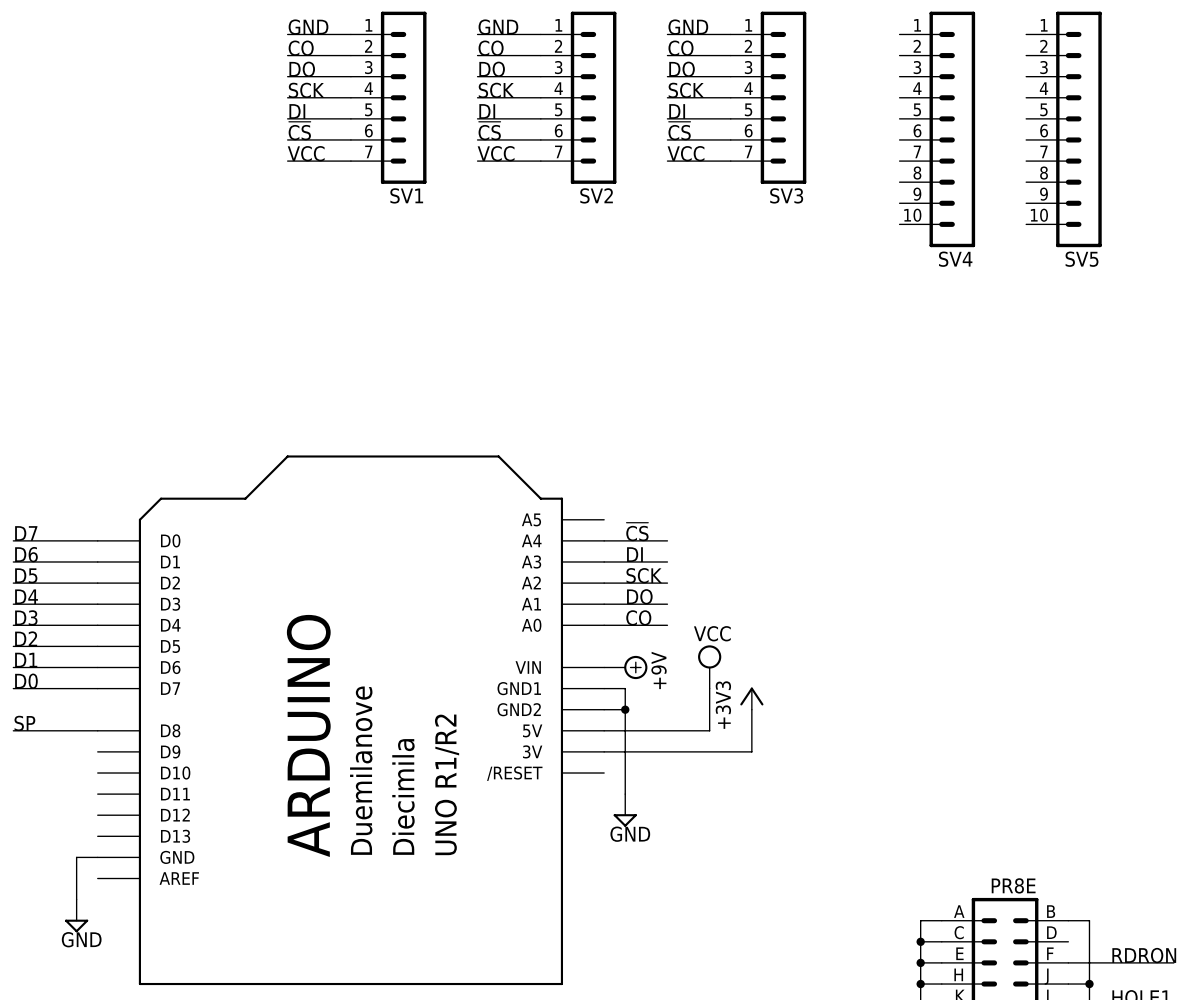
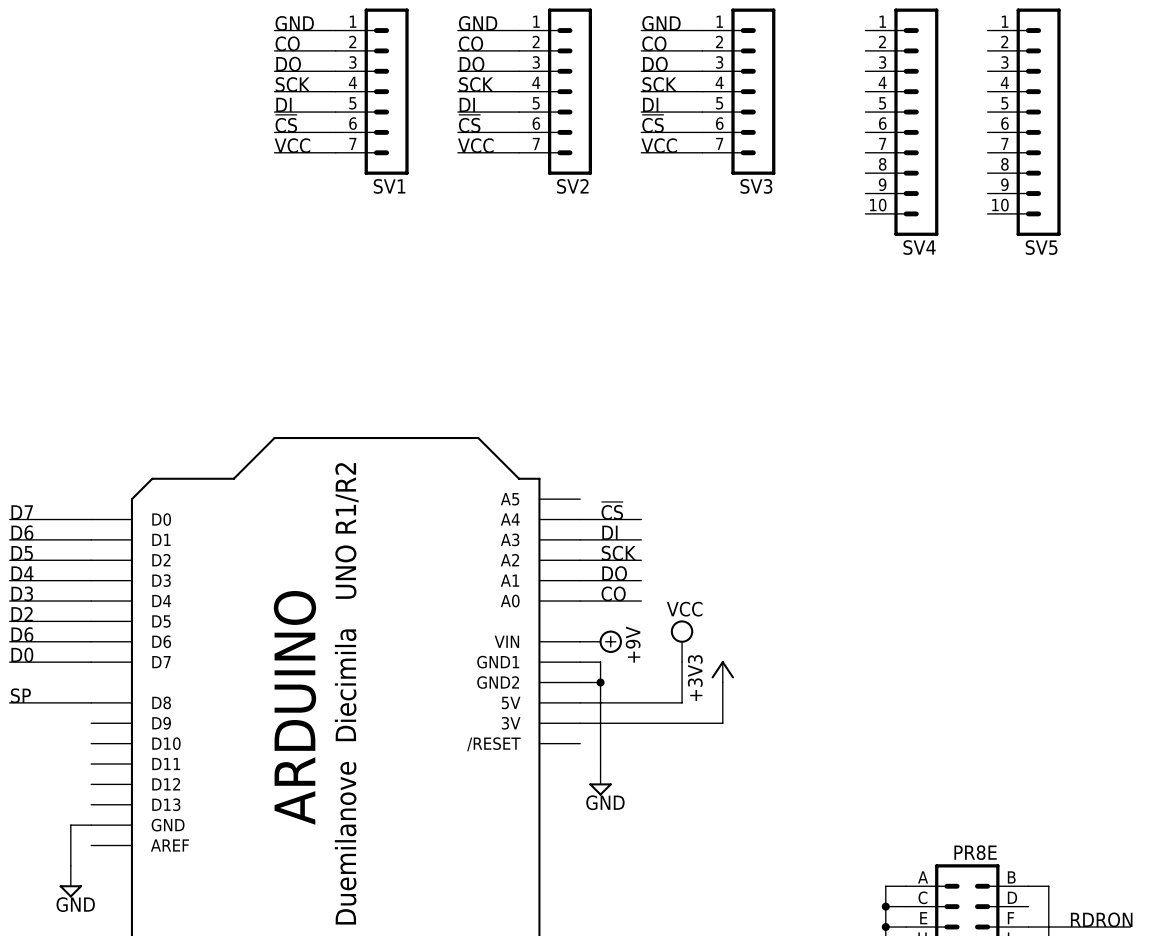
label: D1 (26, 660) -> D6 (22, 634)
part text position: Duemilanove (361, 770) -> Duemilanove (345, 843)
part text position: UNO R1/R2 (447, 784) -> UNO R1/R2 (346, 530)
part text position: Diecimila (403, 796) -> Diecimila (345, 685)

